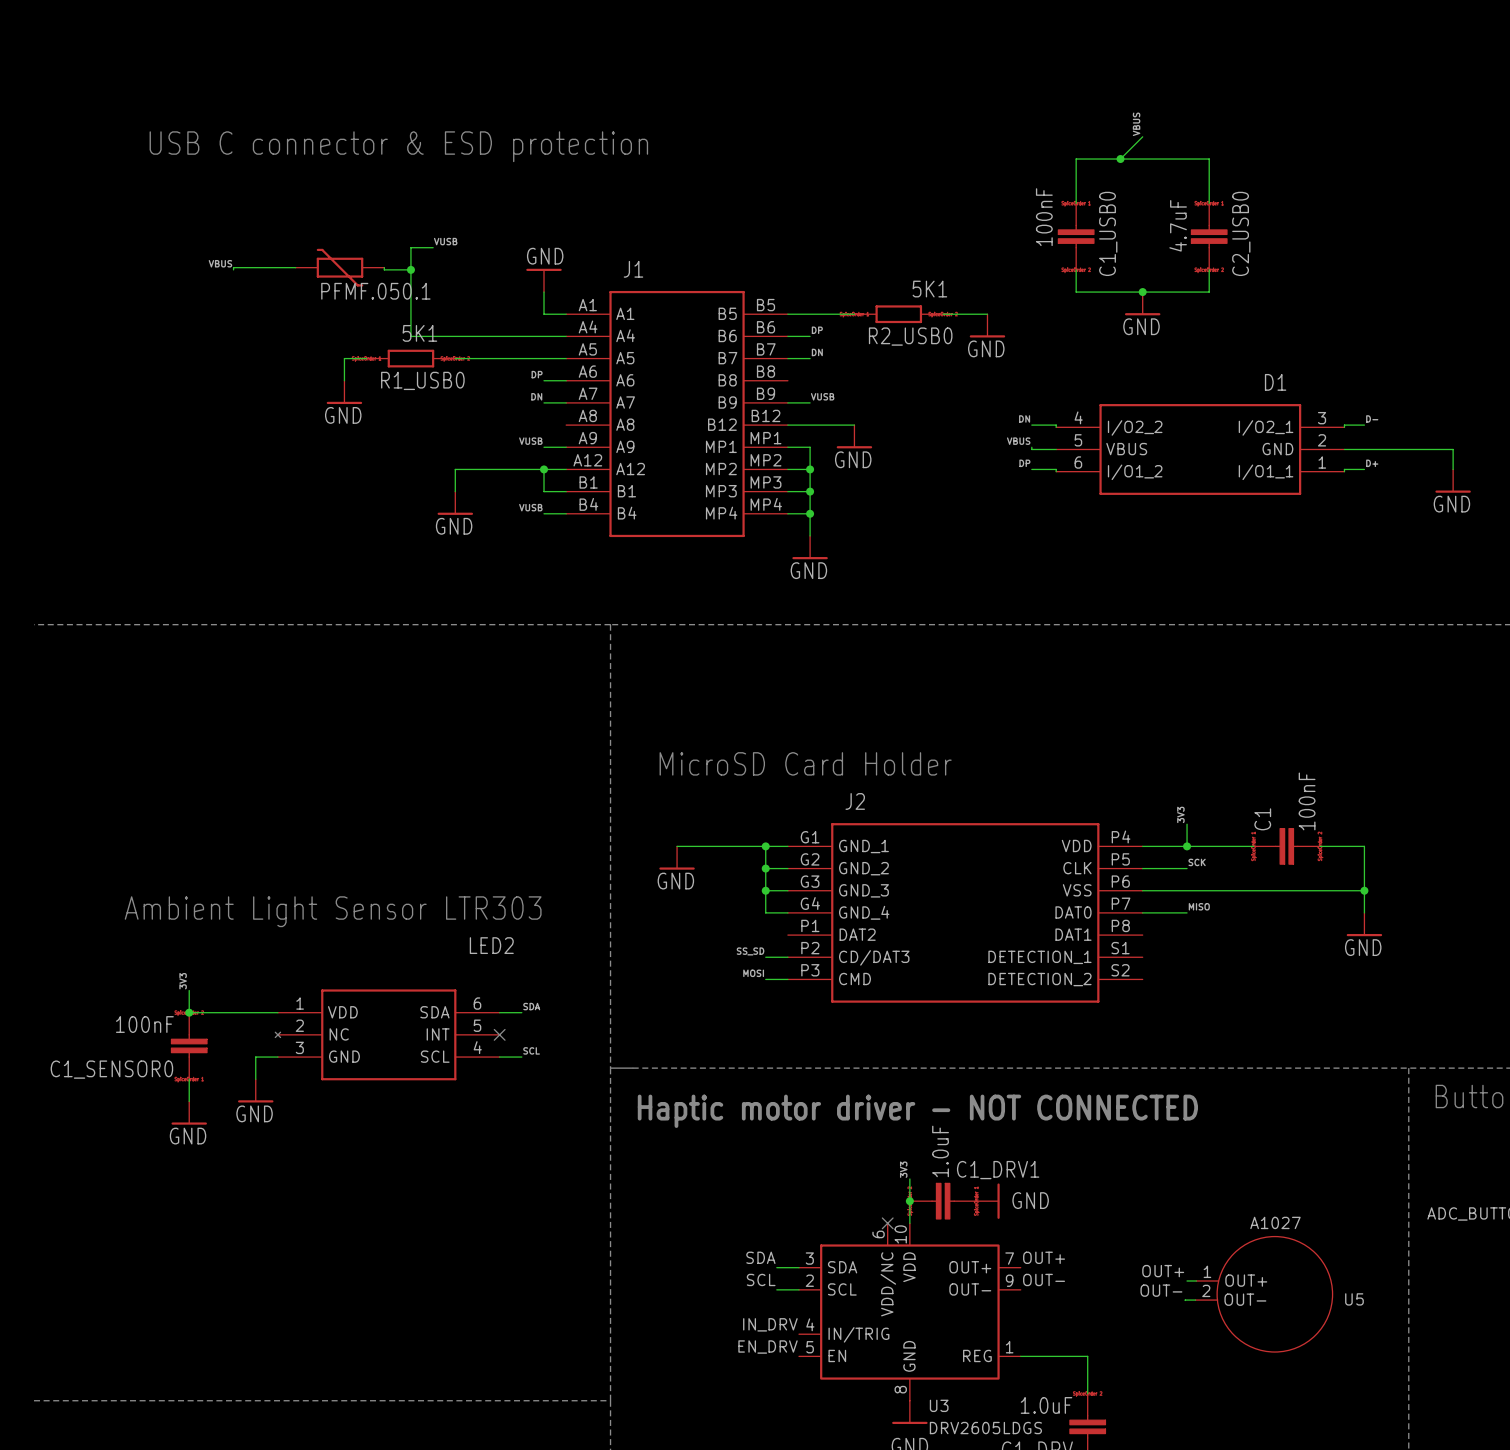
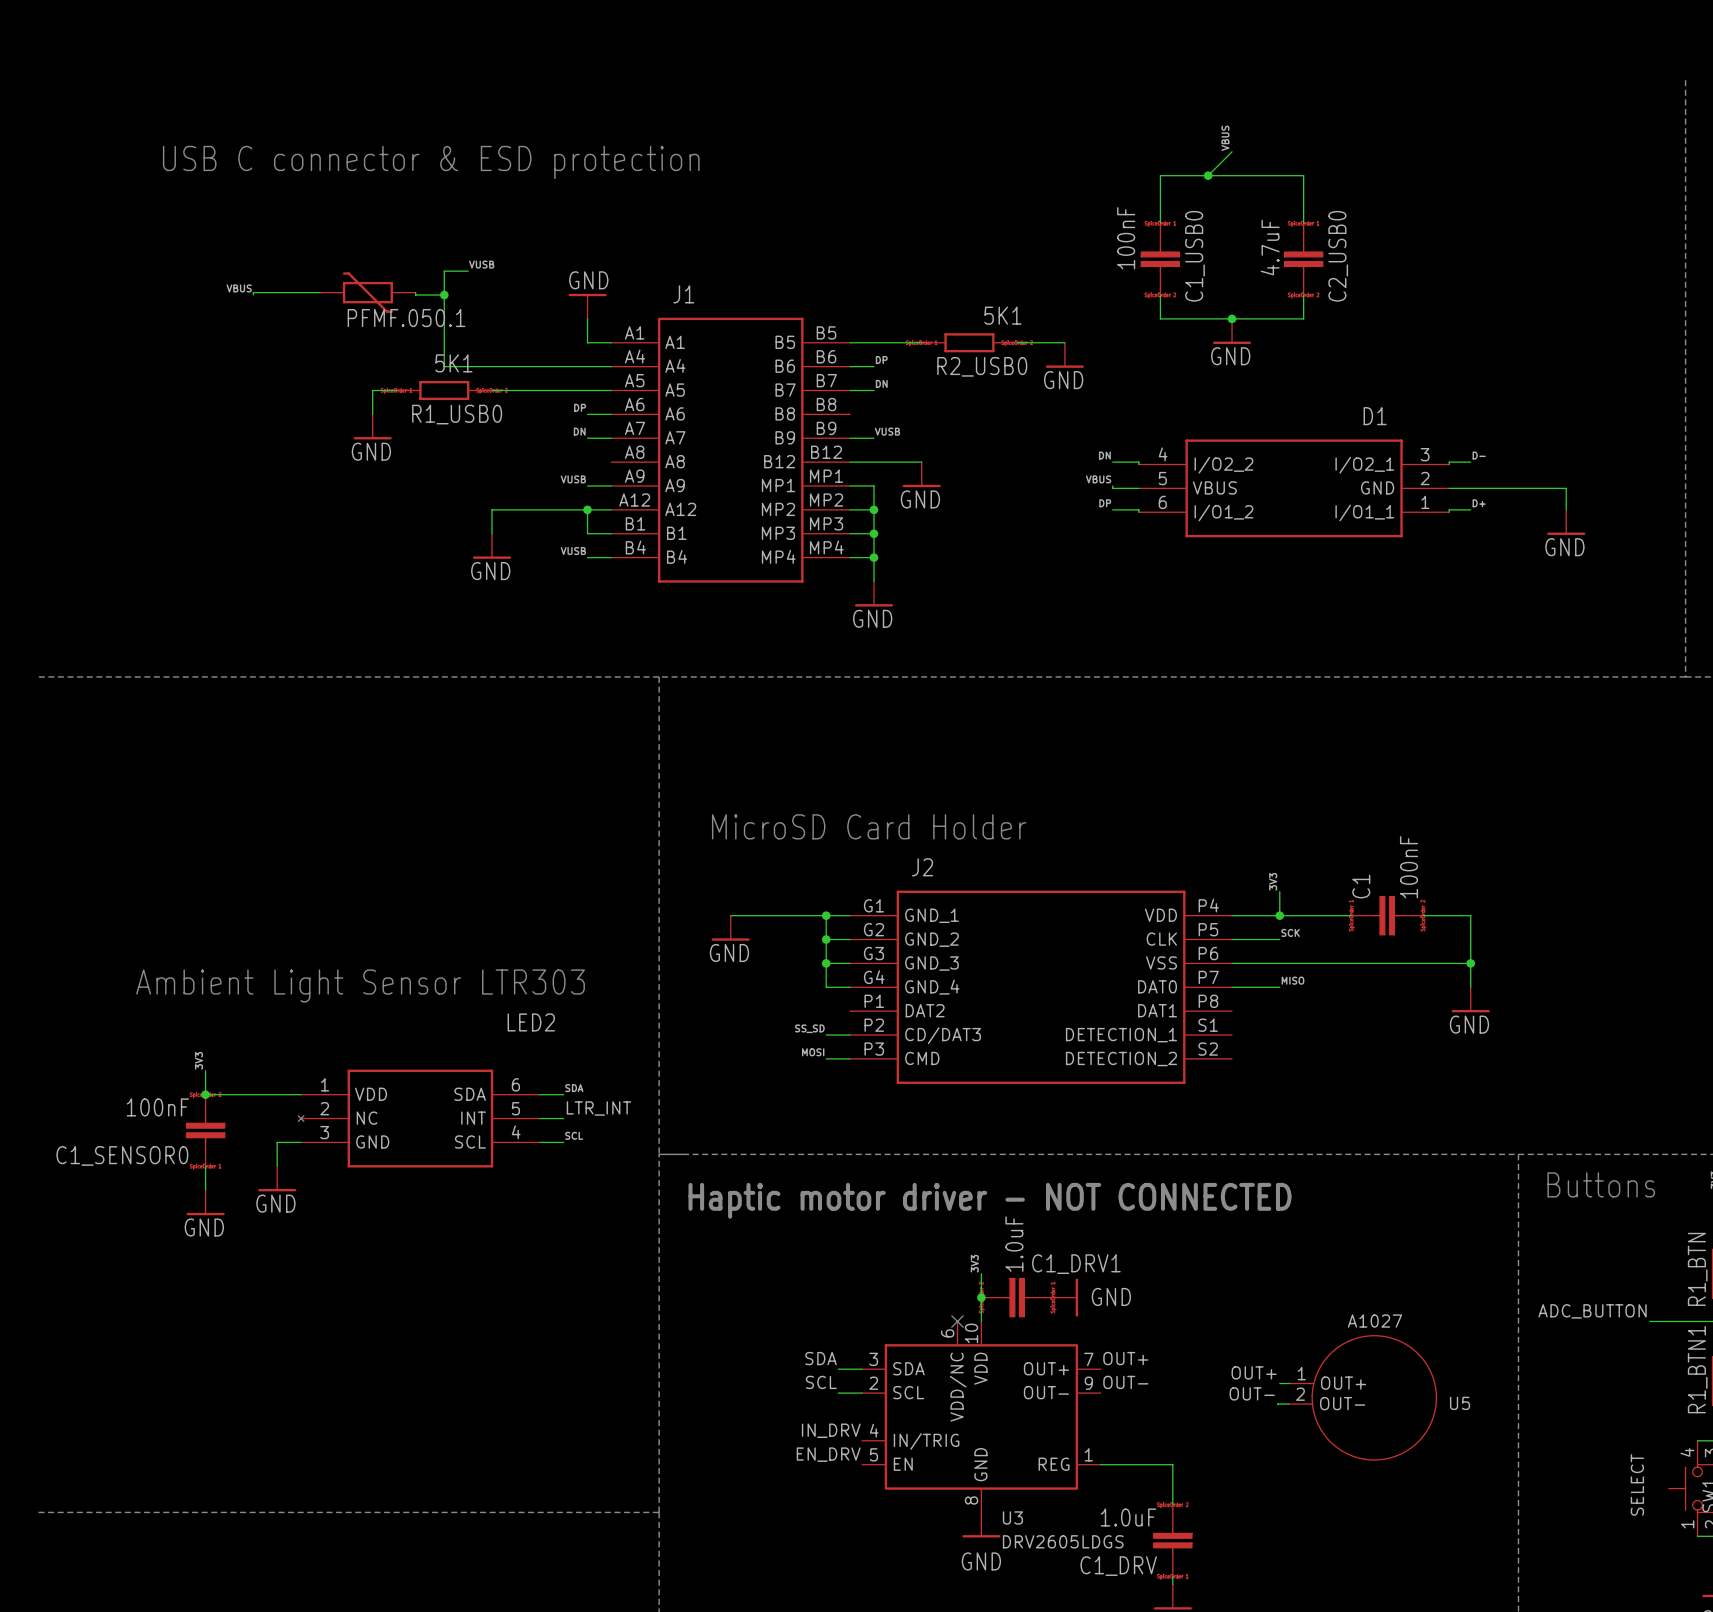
label: none -> LTR_INT (598, 1108)
wire: none -> (539, 1118) (563, 1118)
no-connect mark: (499, 1034) -> none

